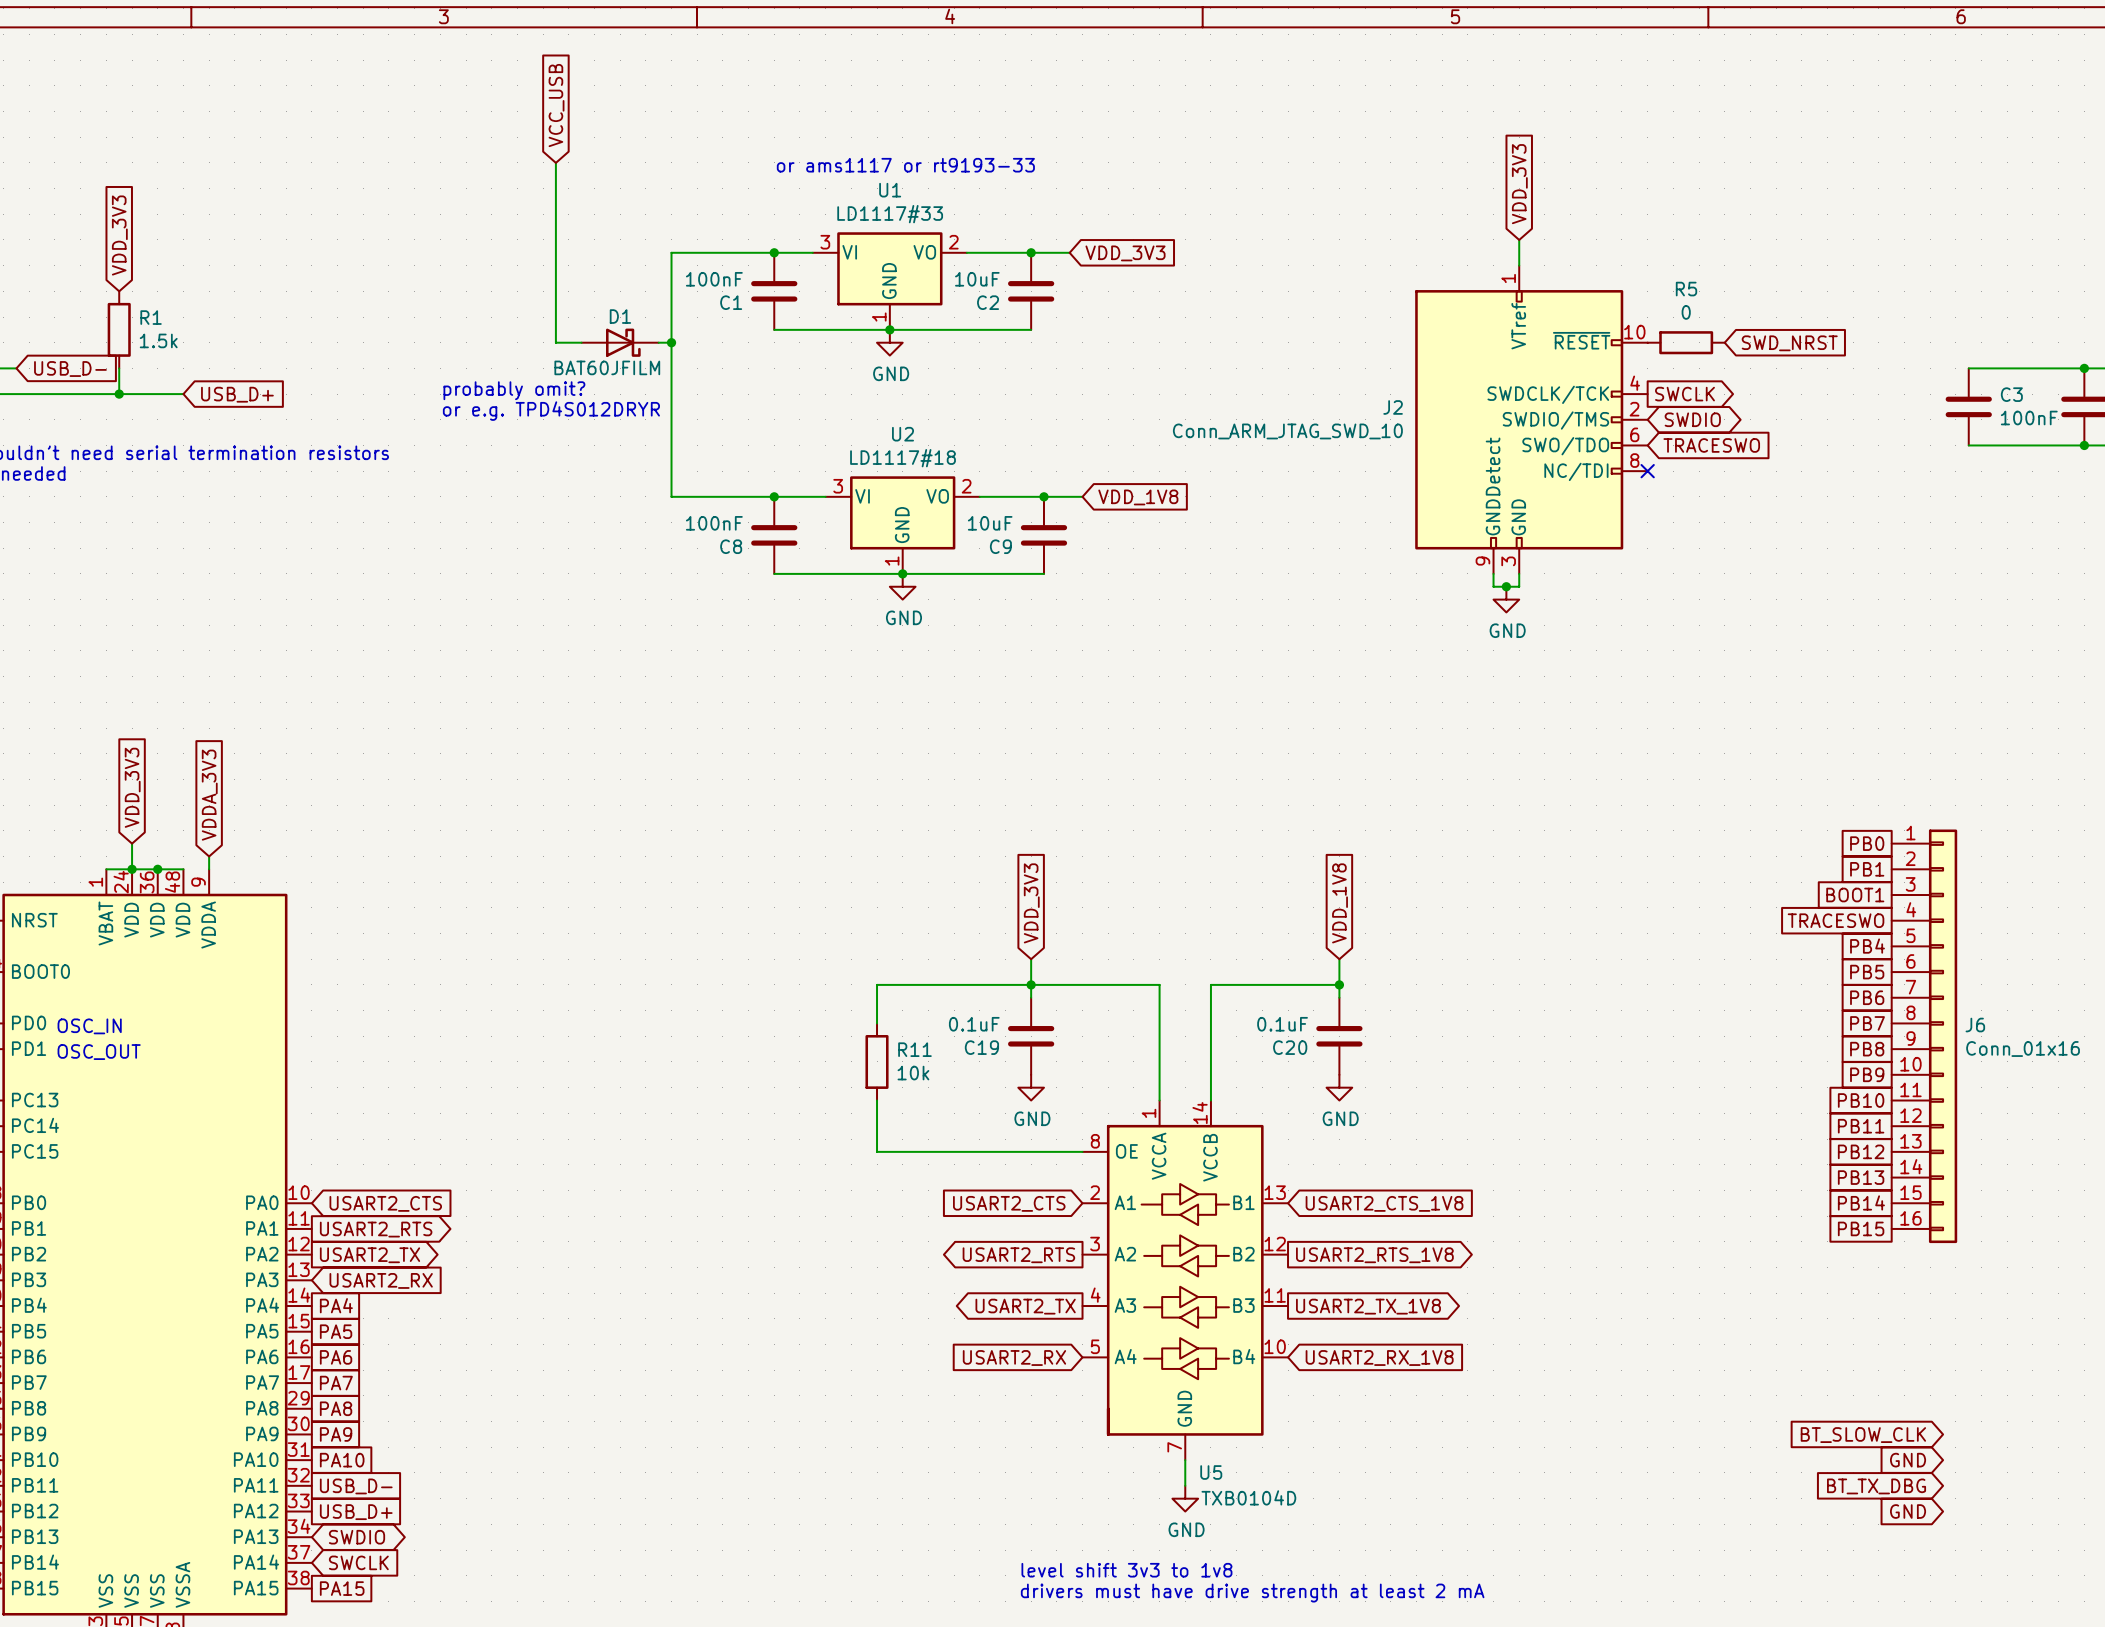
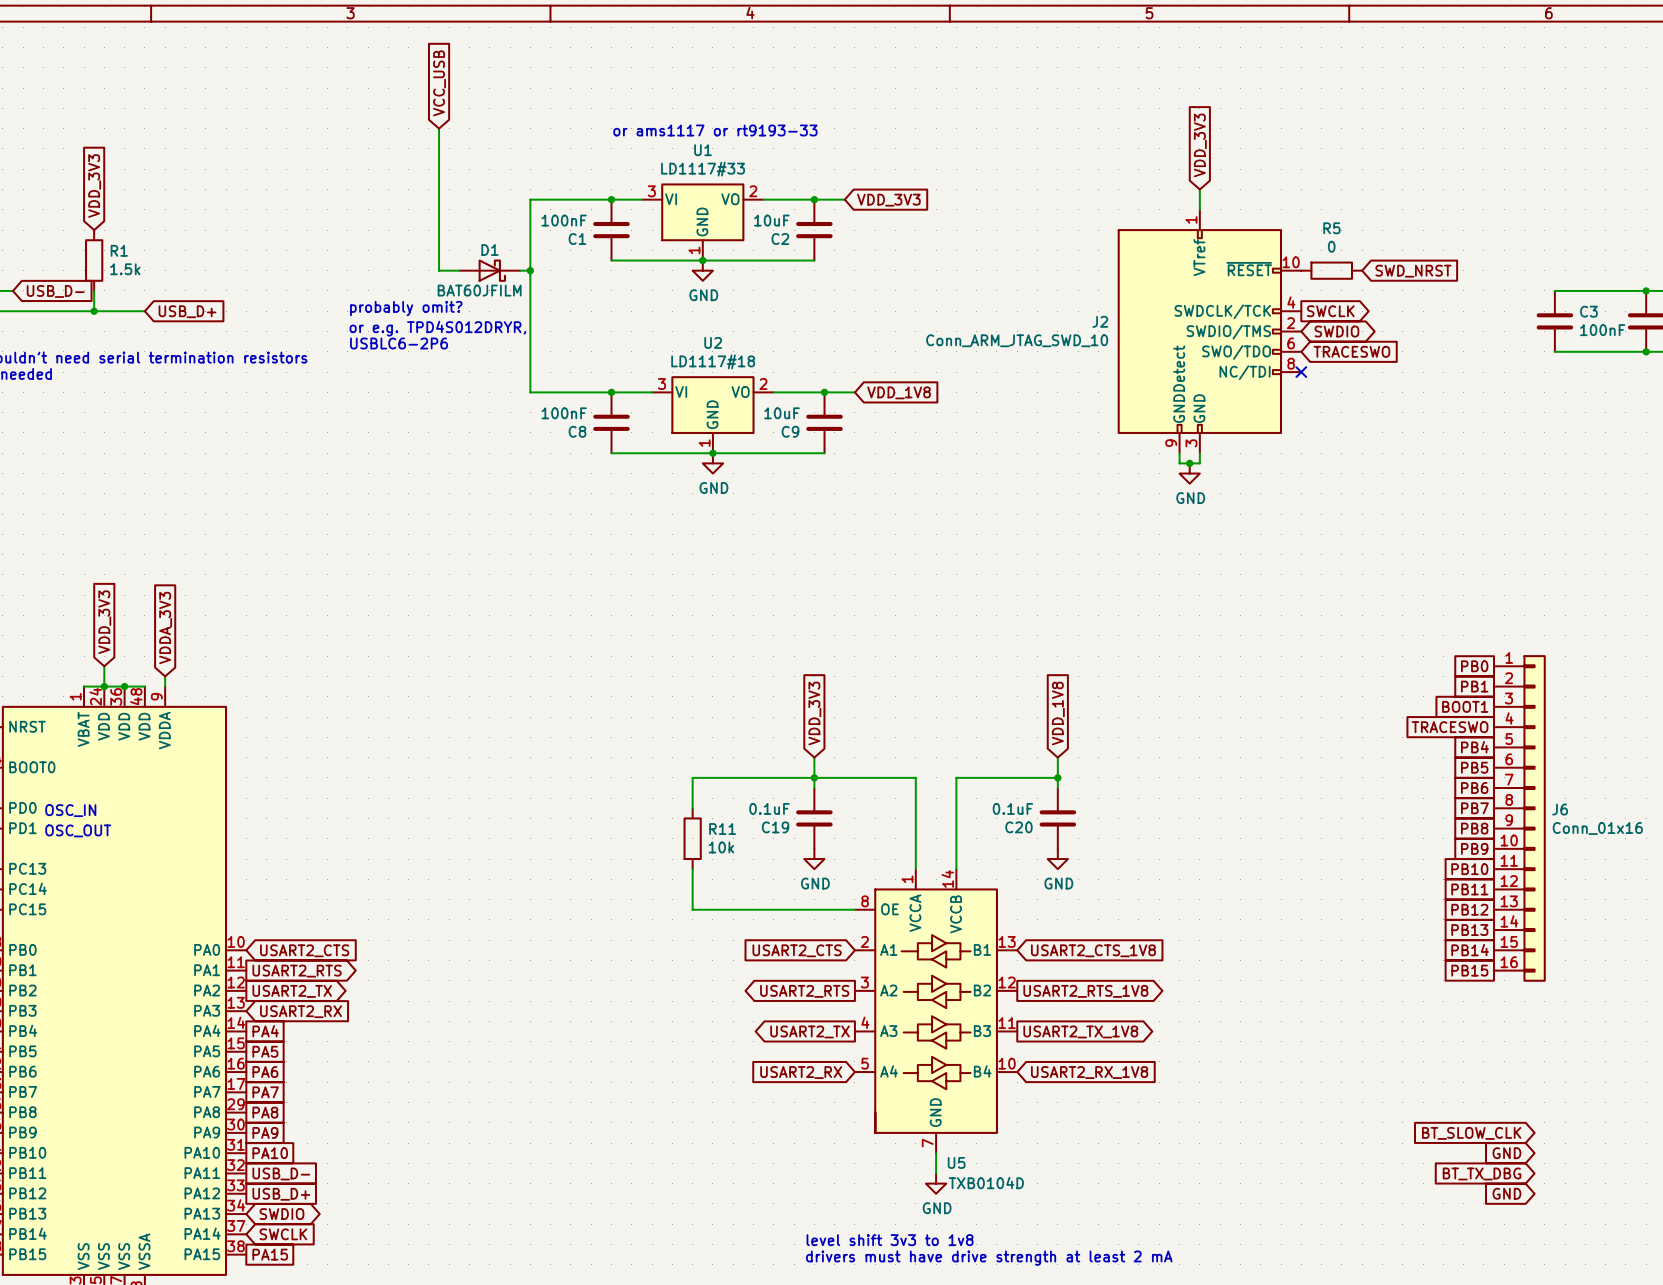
text: or e.g. TPD4S012DRYR (551, 411) -> or e.g. TPD4S012DRYR, (437, 328)
text: none -> USBLC6-2P6 (399, 343)

